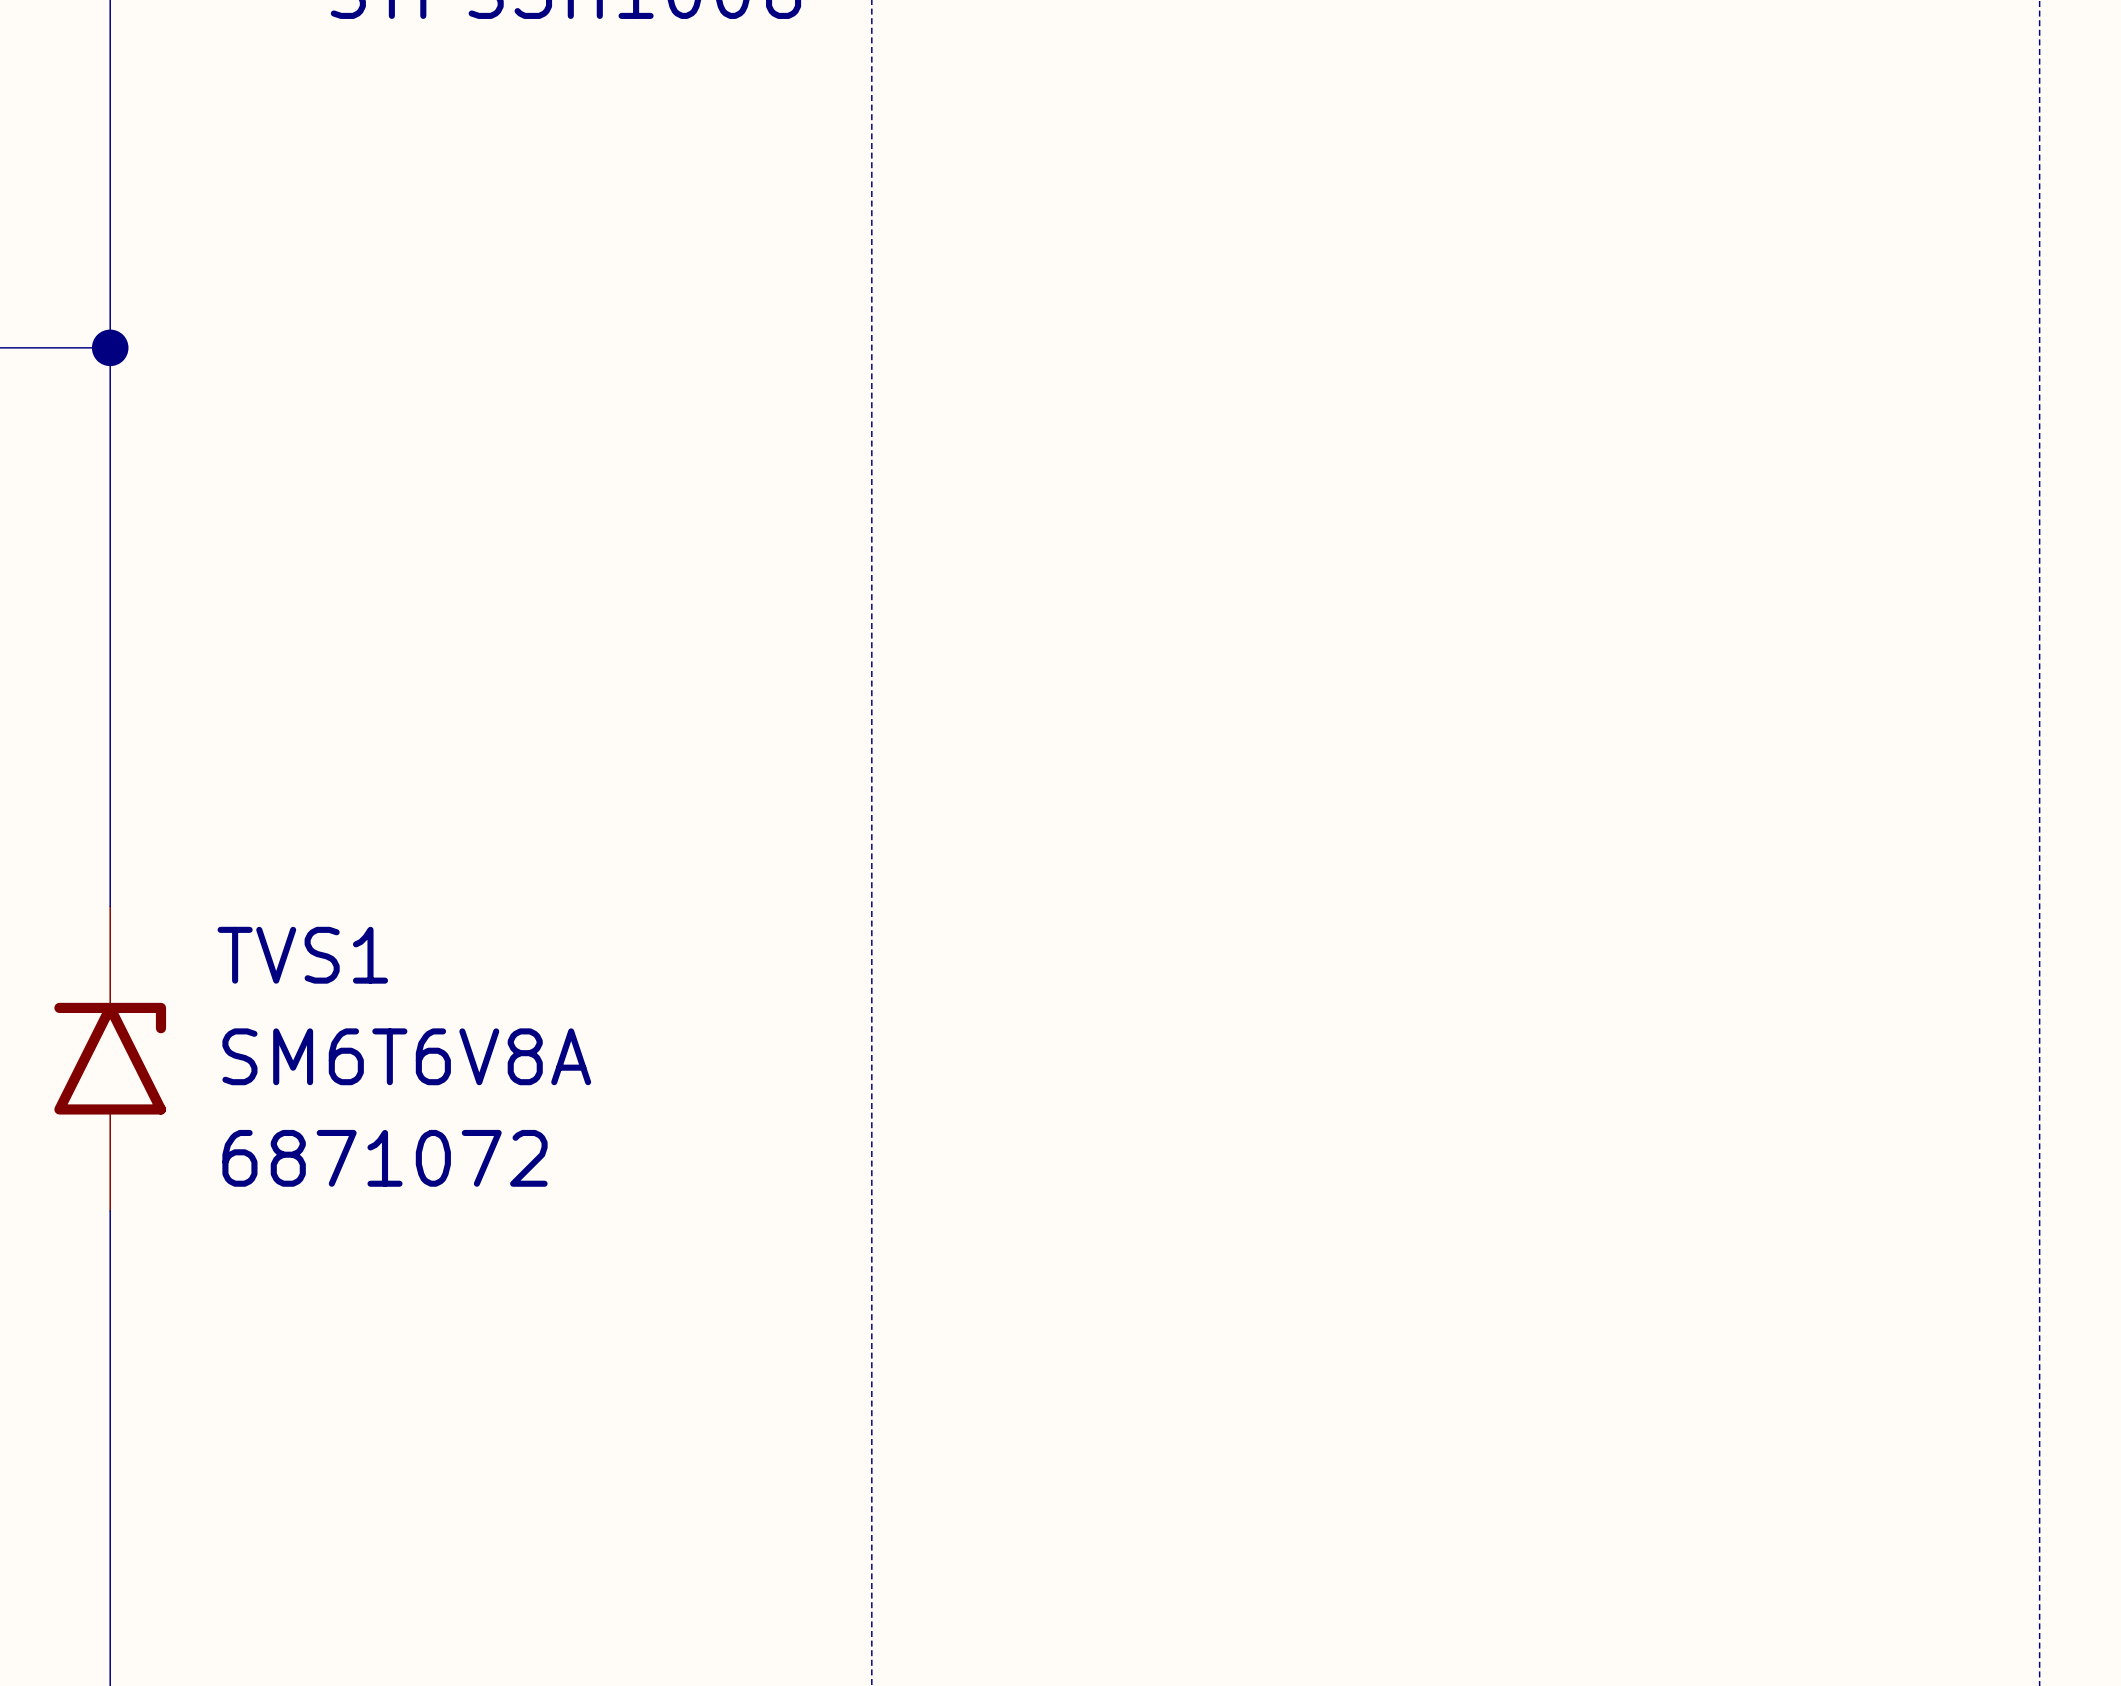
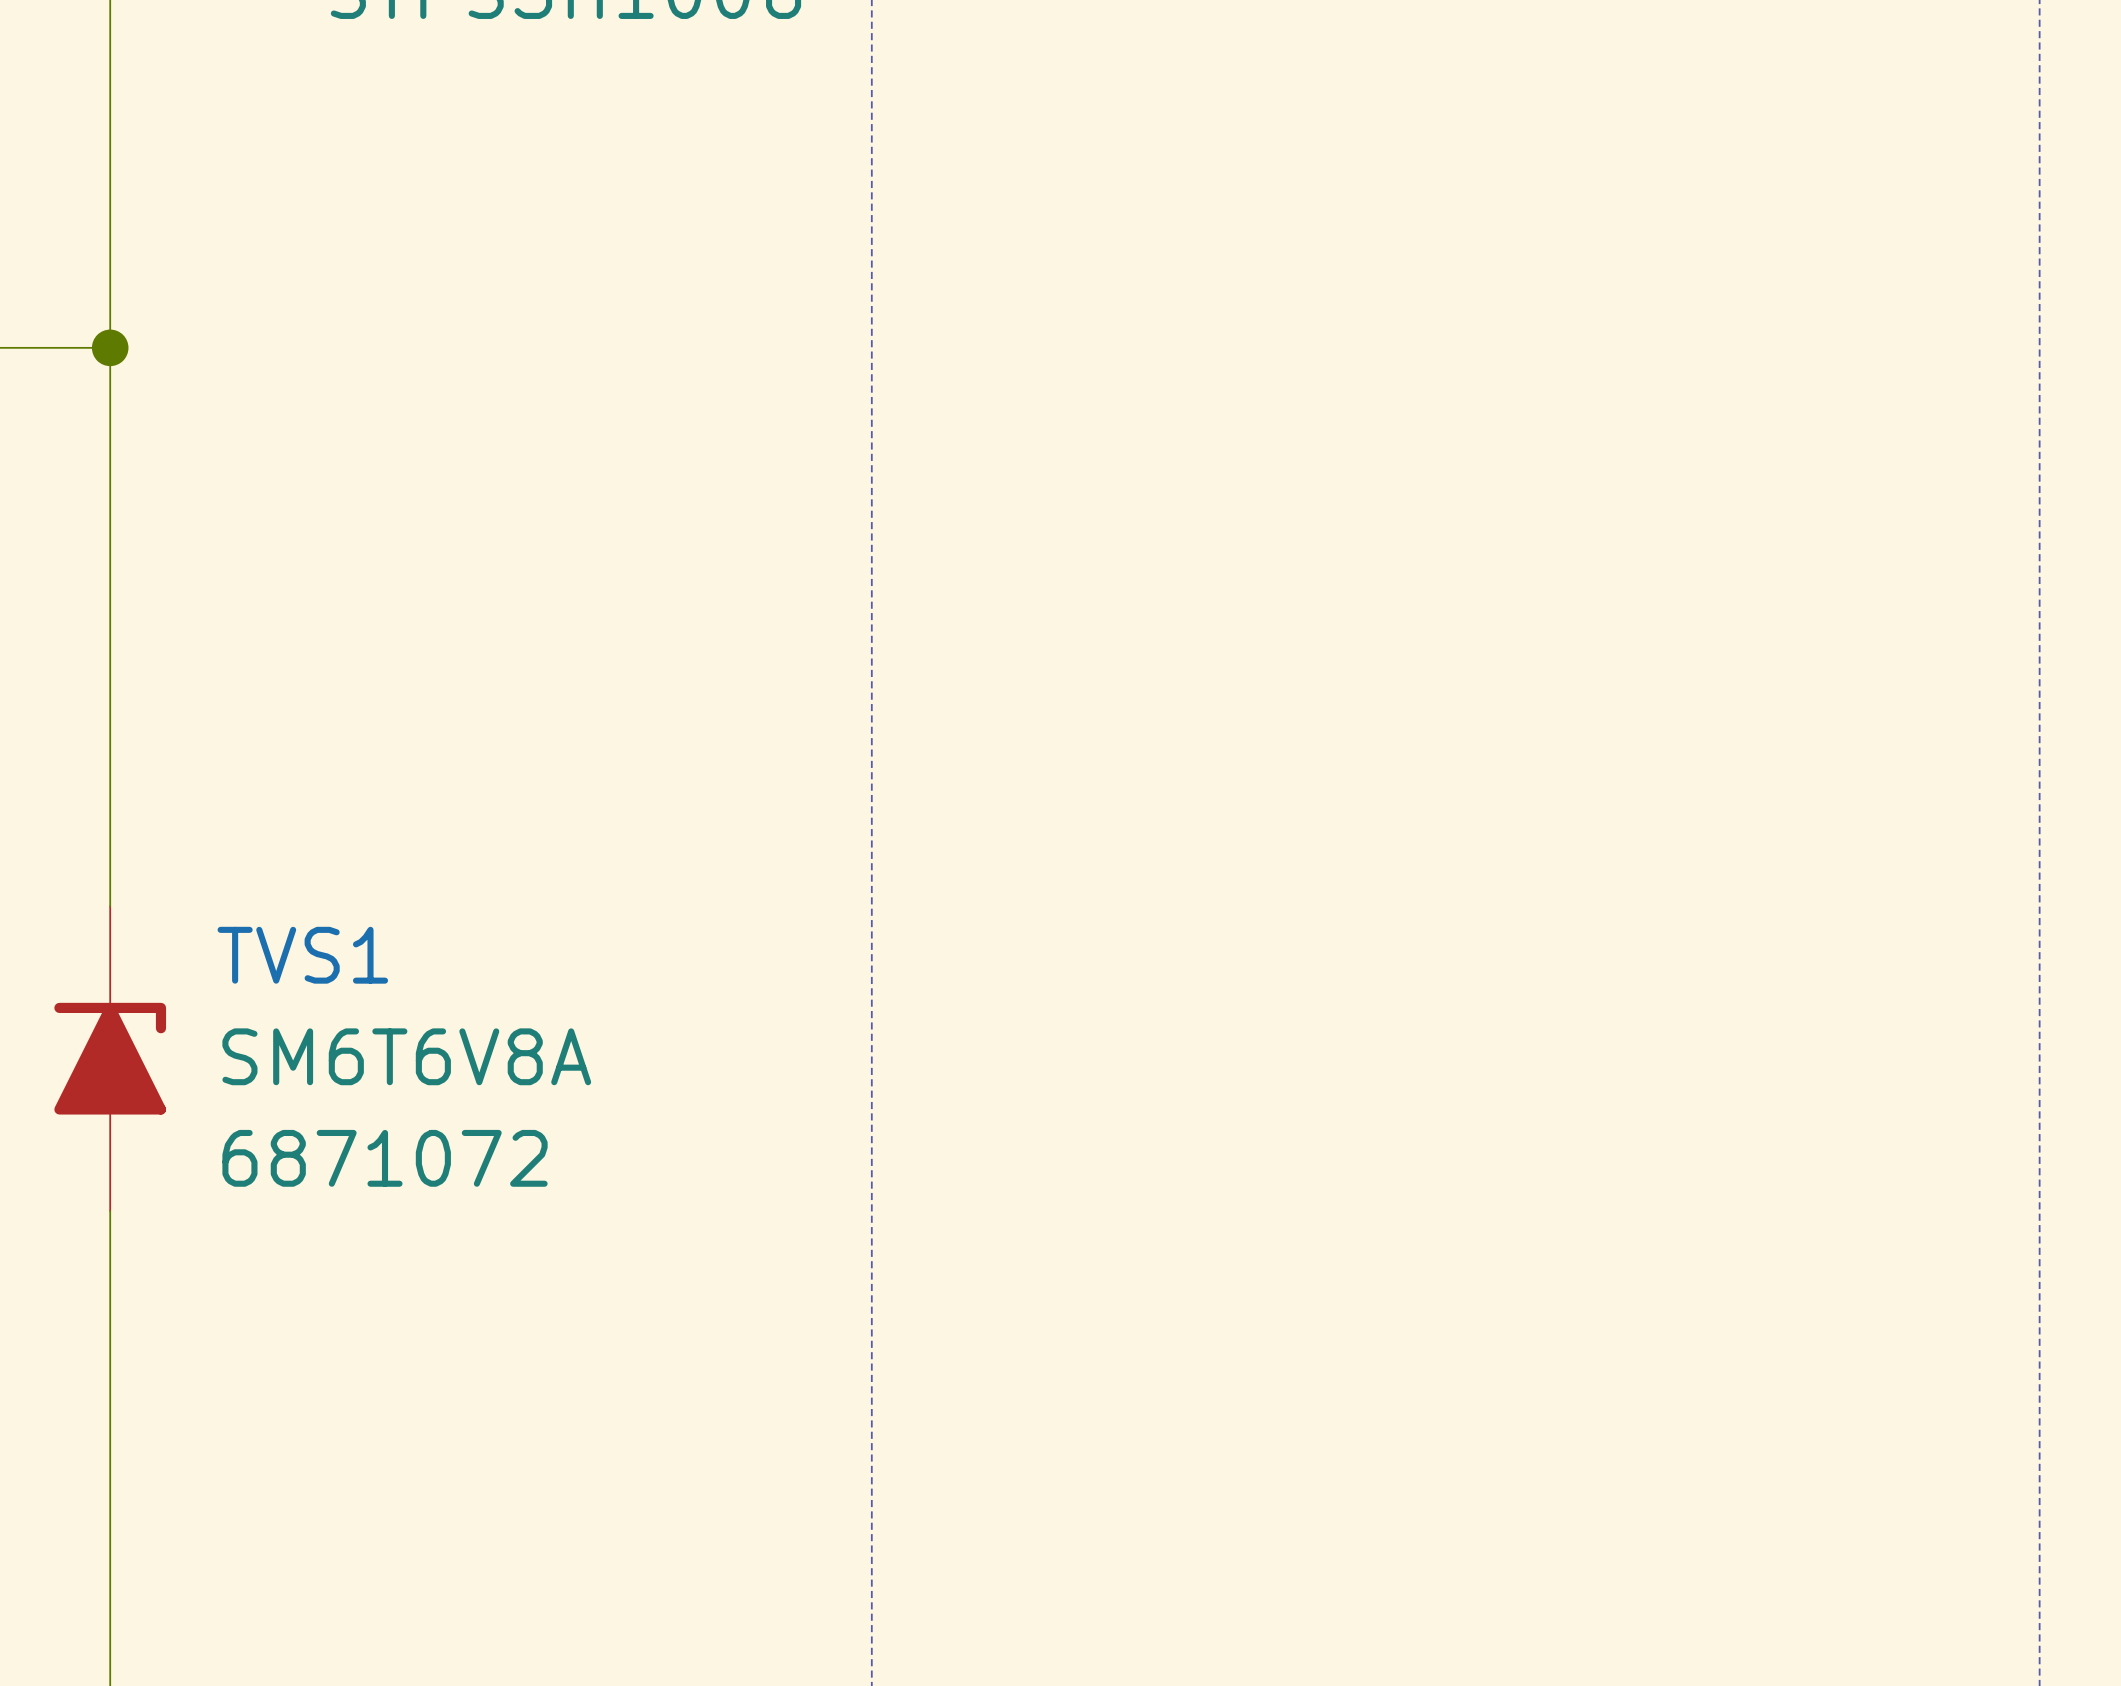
TVS1 symbol: [54, 906, 167, 1212] -> [54, 906, 167, 1212]

